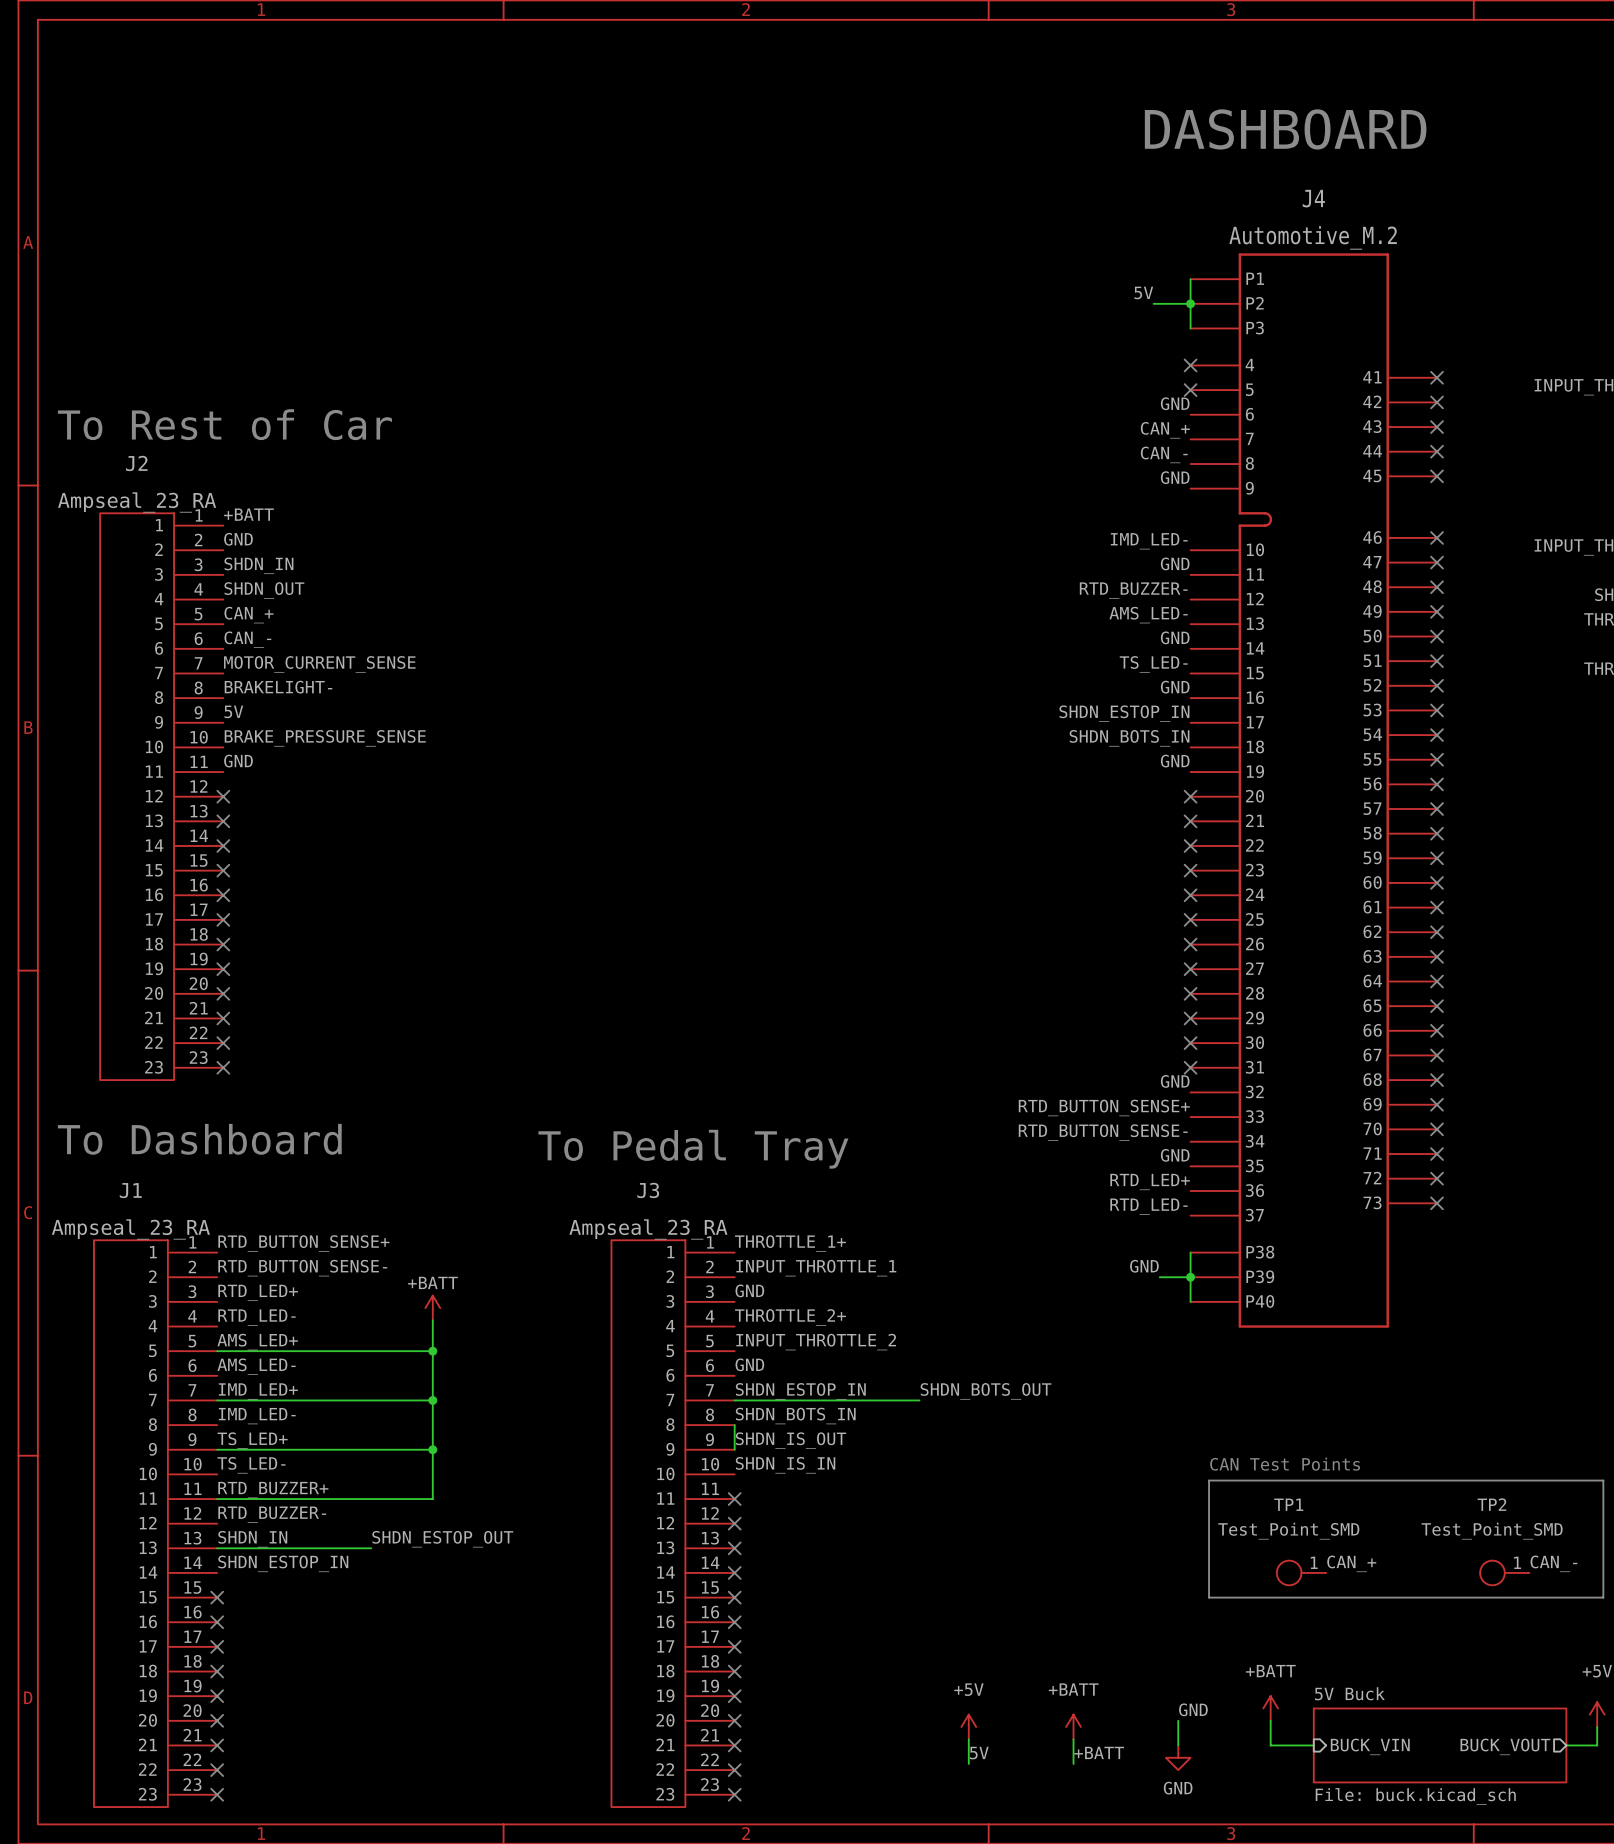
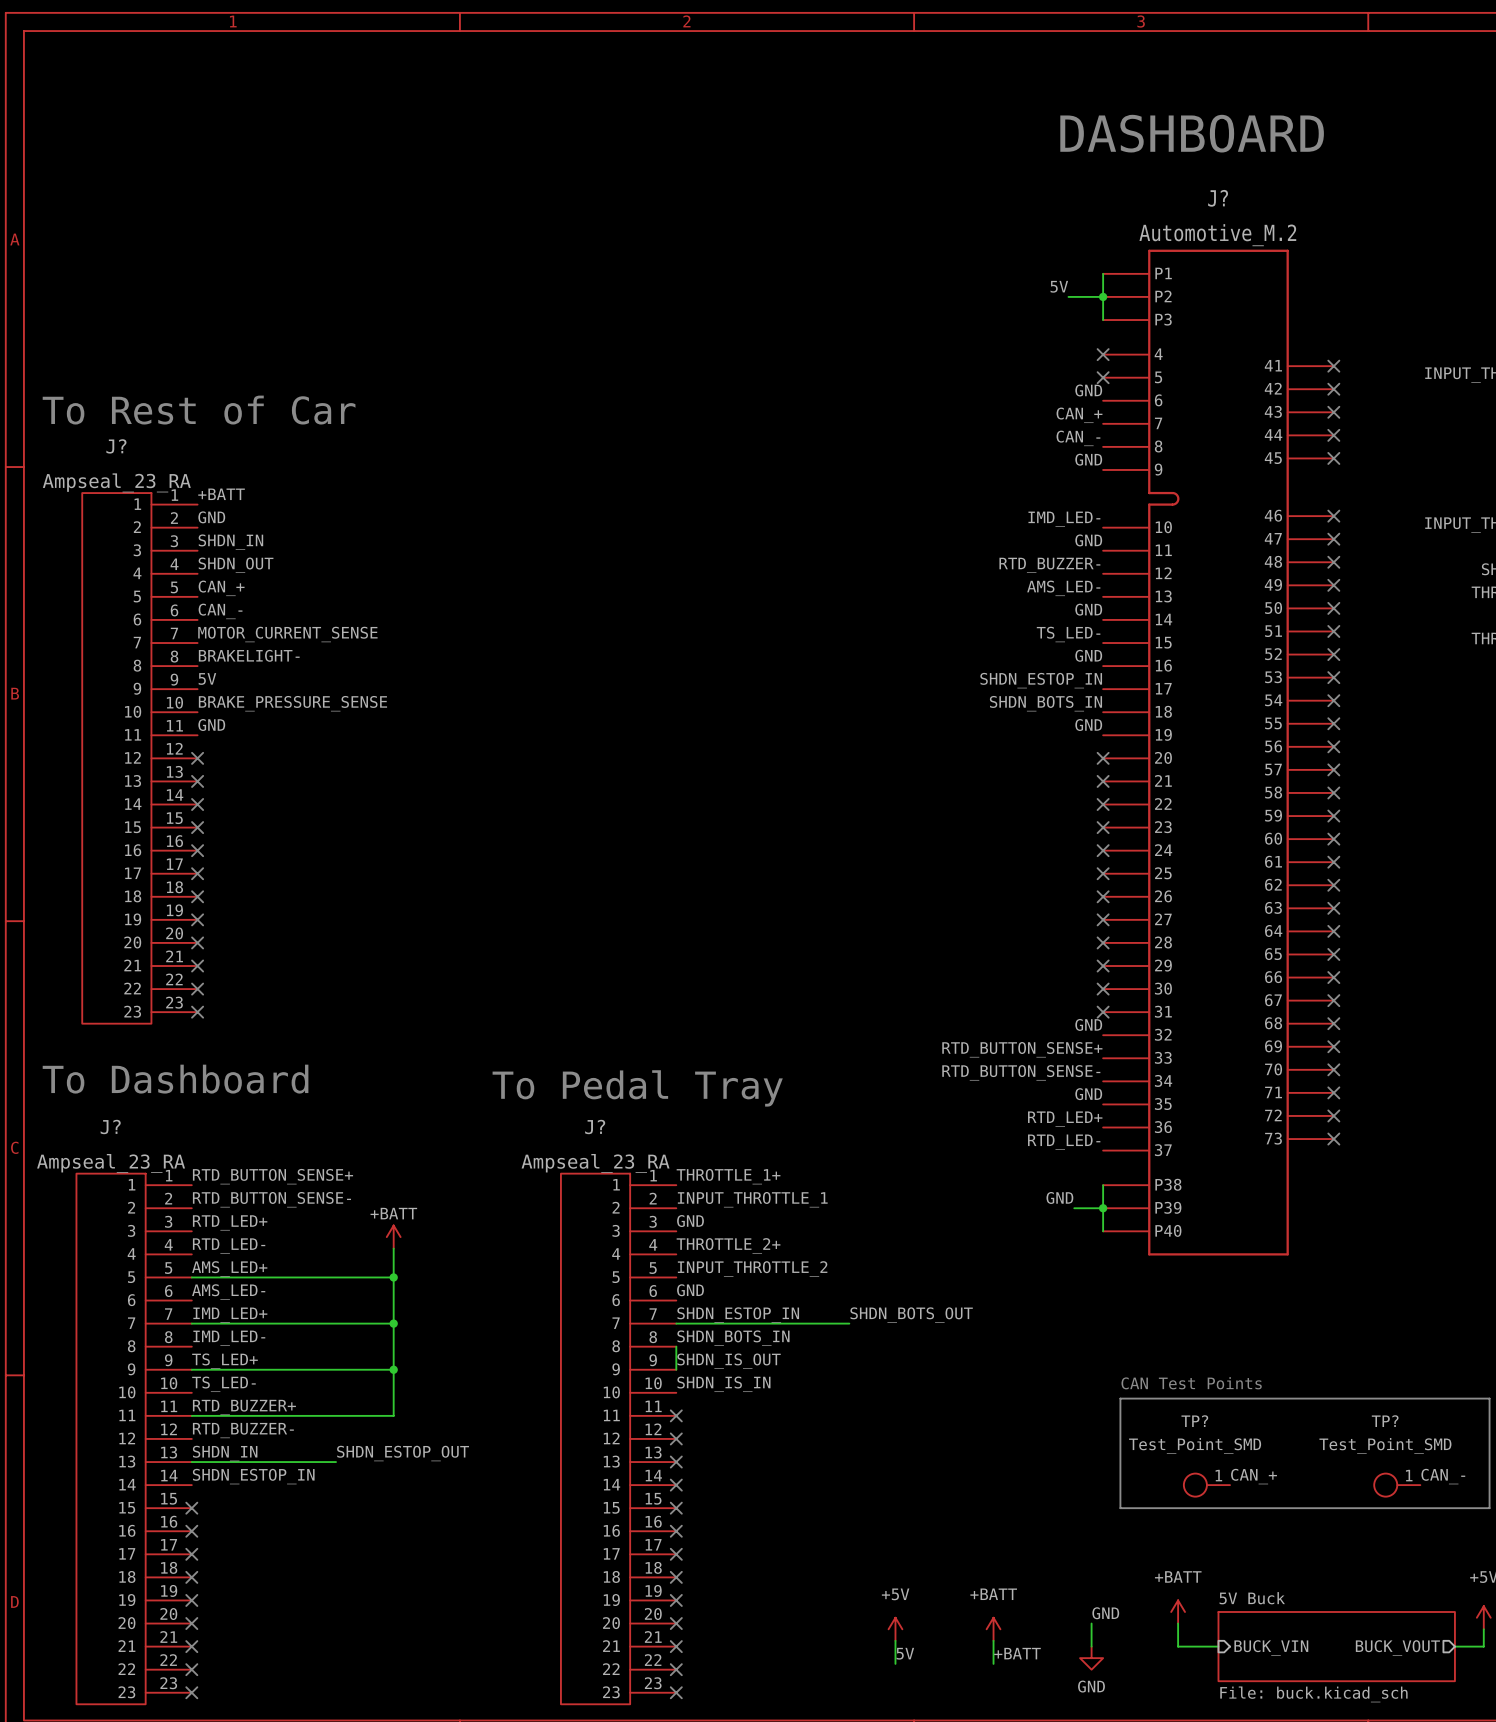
J4 name: J4 (1313, 198) -> J? (1218, 198)
J2 name: J2 (136, 463) -> J? (116, 446)
J1 name: J1 (130, 1190) -> J? (110, 1126)
J3 name: J3 (648, 1190) -> J? (595, 1126)
TP1 name: TP1 (1288, 1504) -> TP? (1194, 1421)
TP2 name: TP2 (1491, 1504) -> TP? (1385, 1421)

